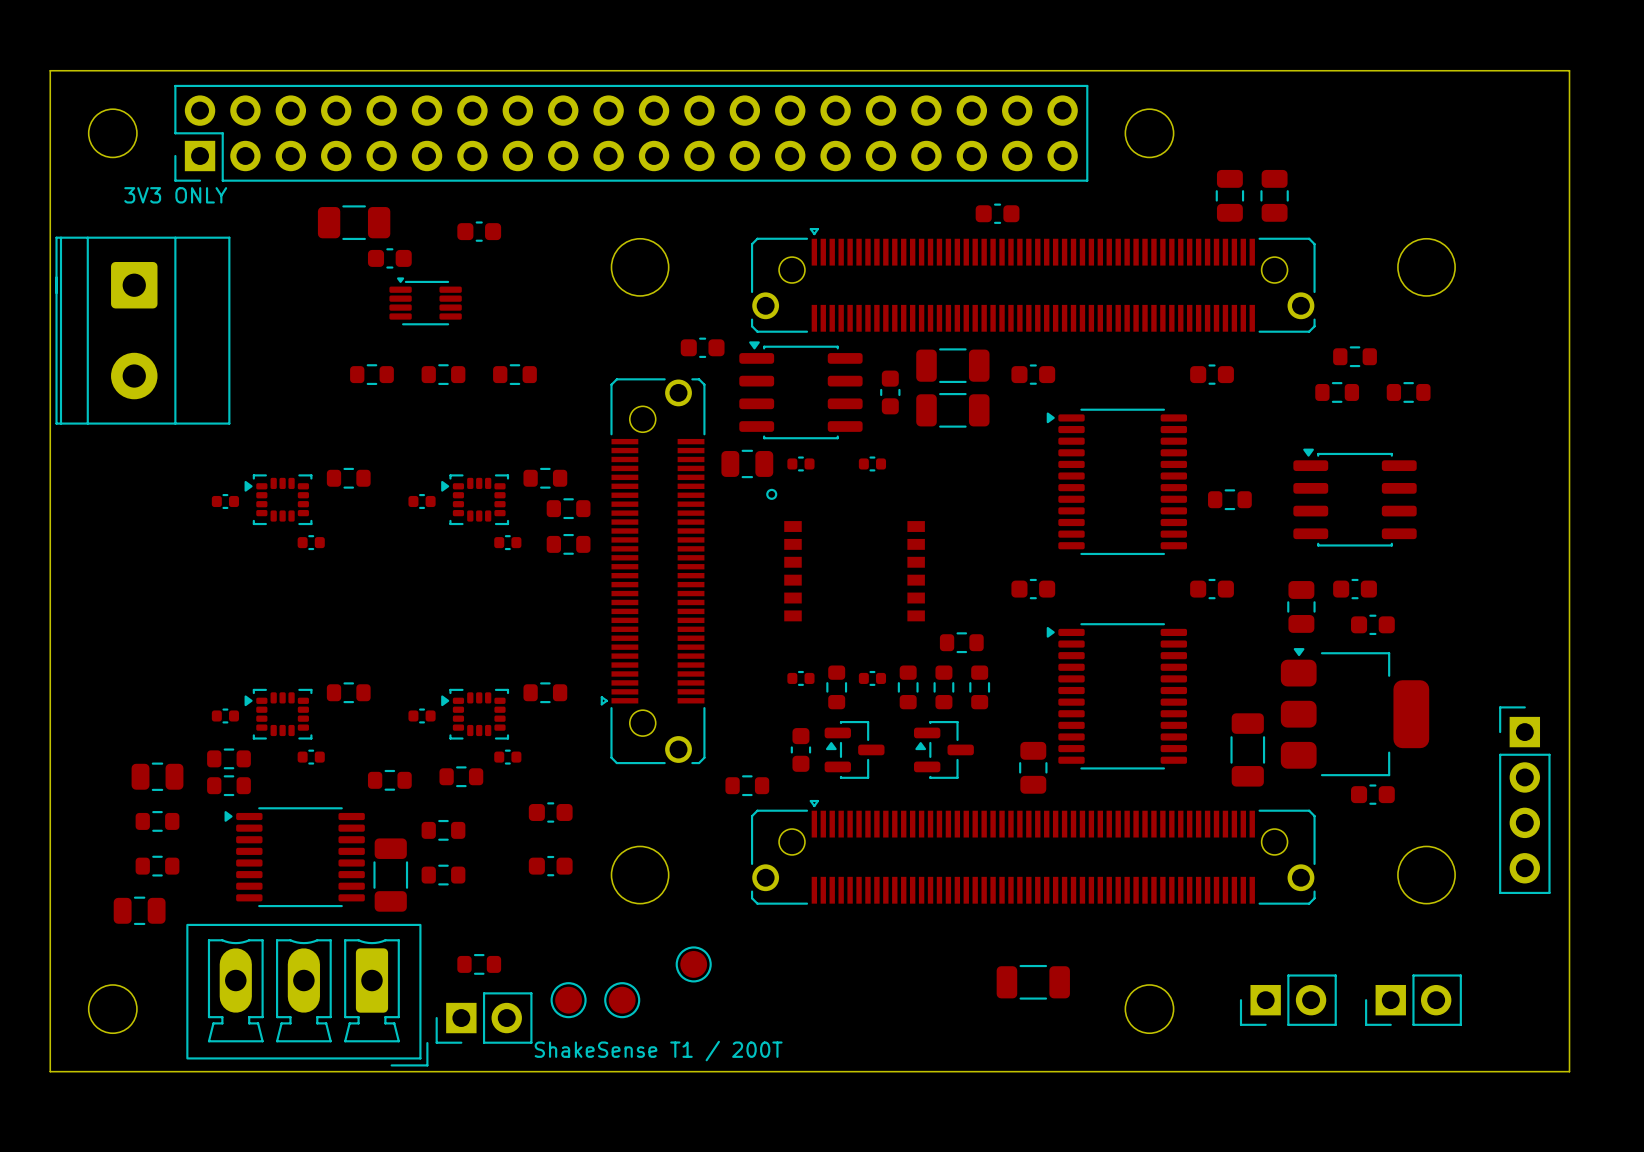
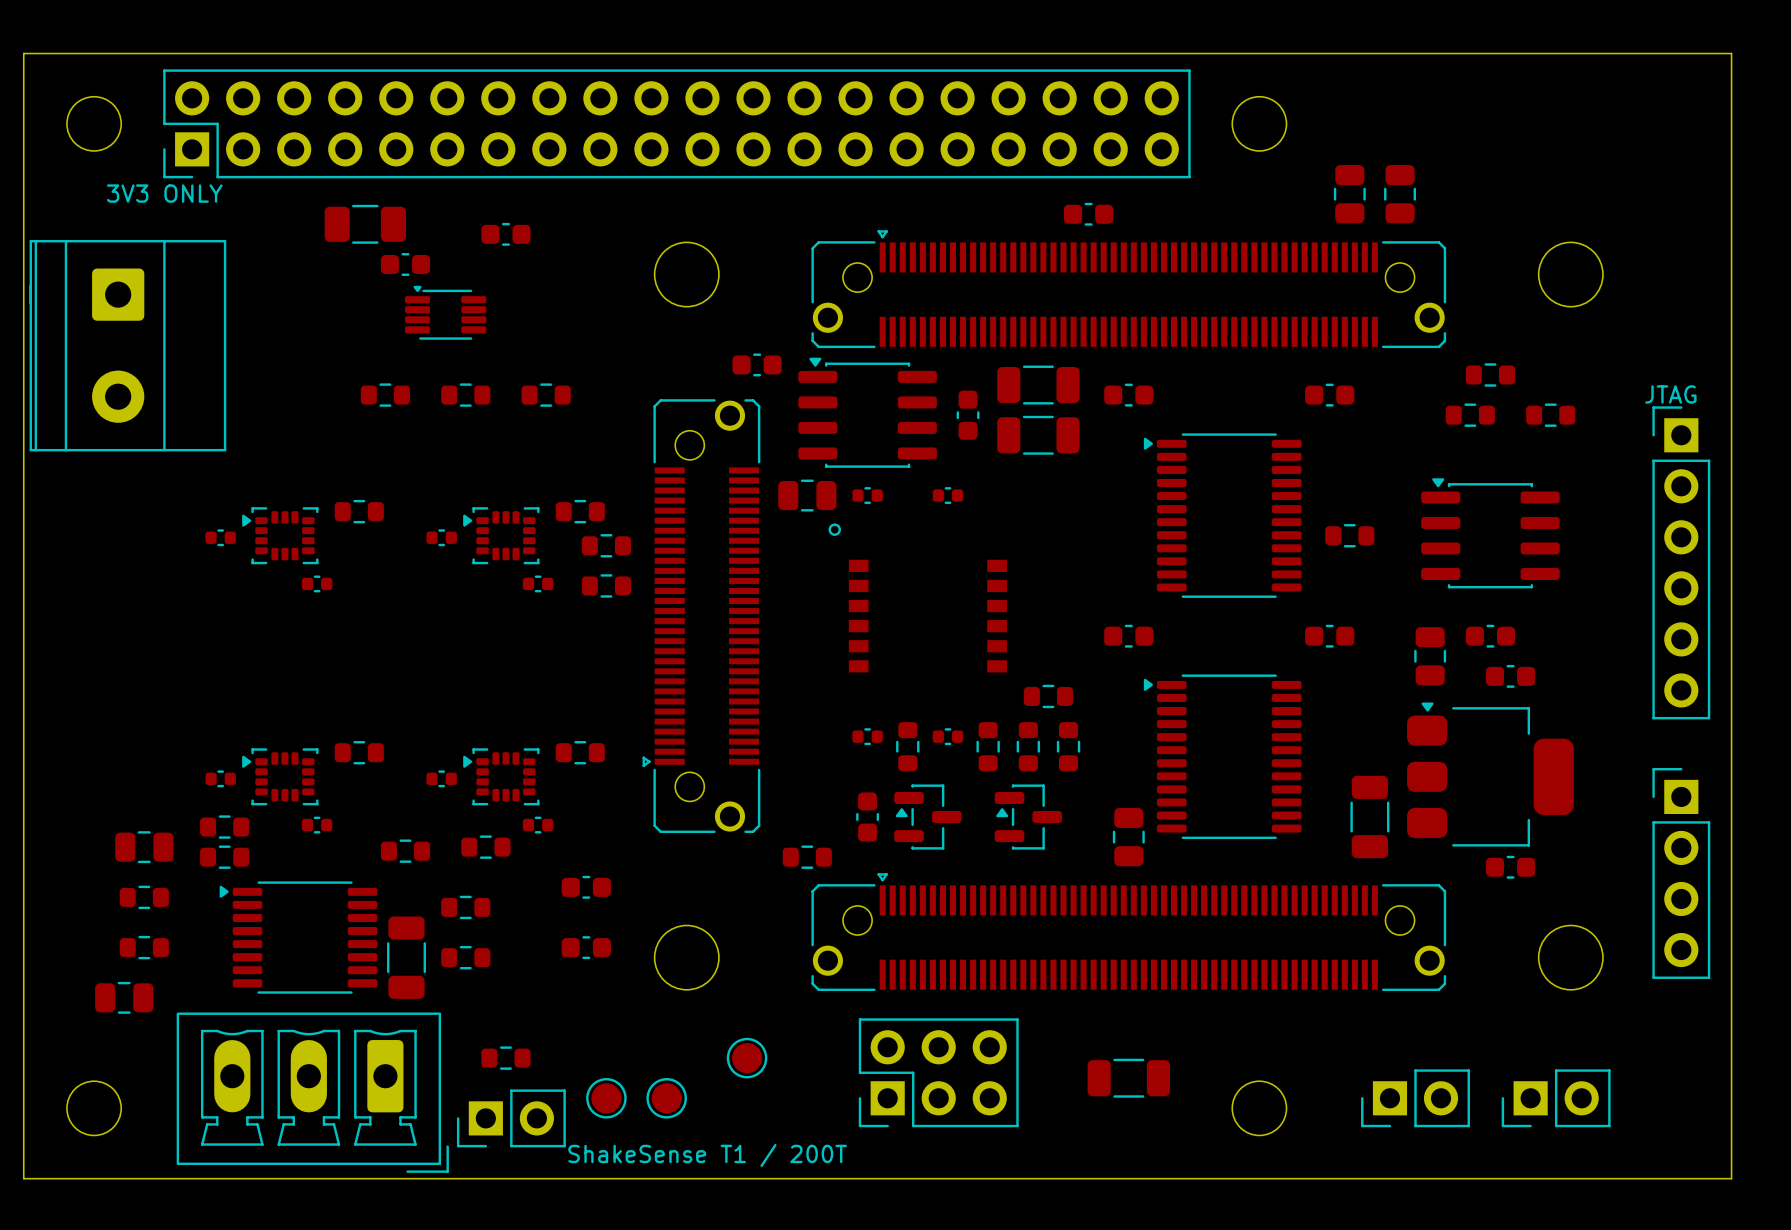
text: none -> JTAG (1670, 394)
part: none -> (1681, 562)
part: none -> (938, 1072)

